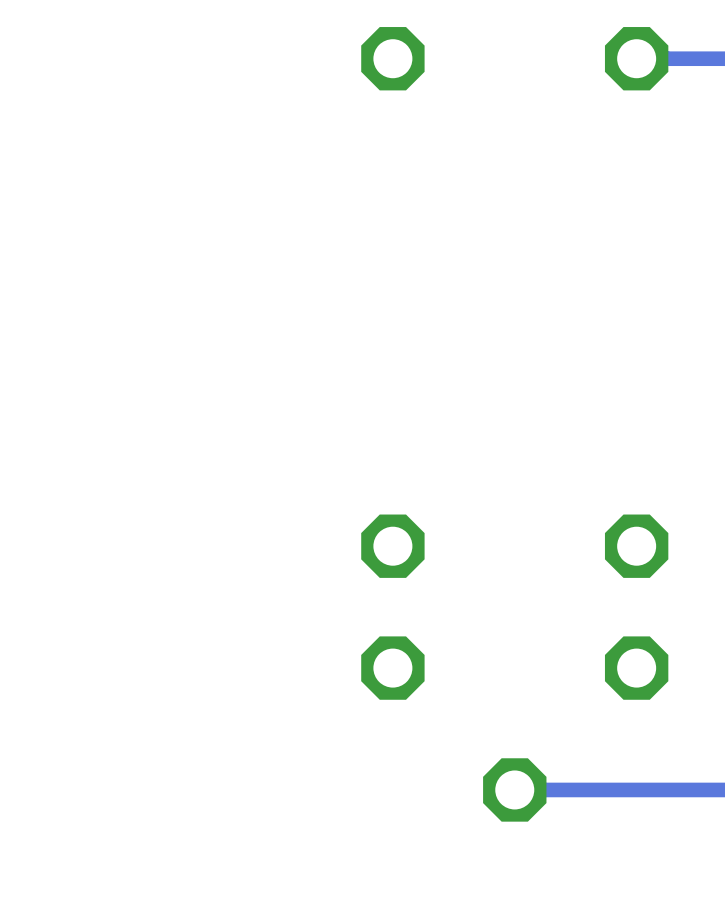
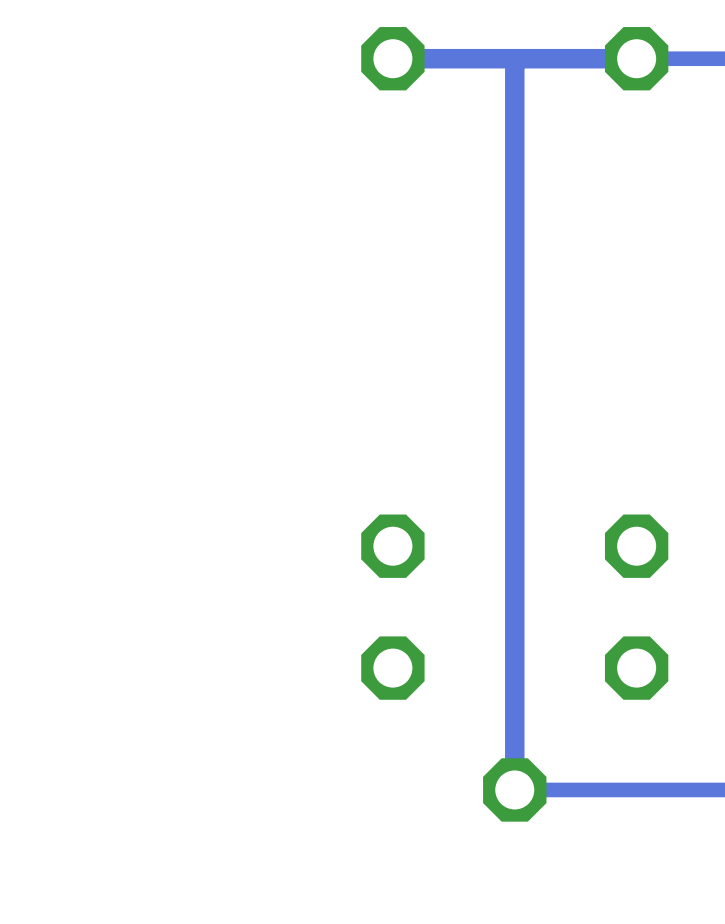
track: none -> (514, 58) (514, 789)
track: none -> (636, 58) (392, 58)

